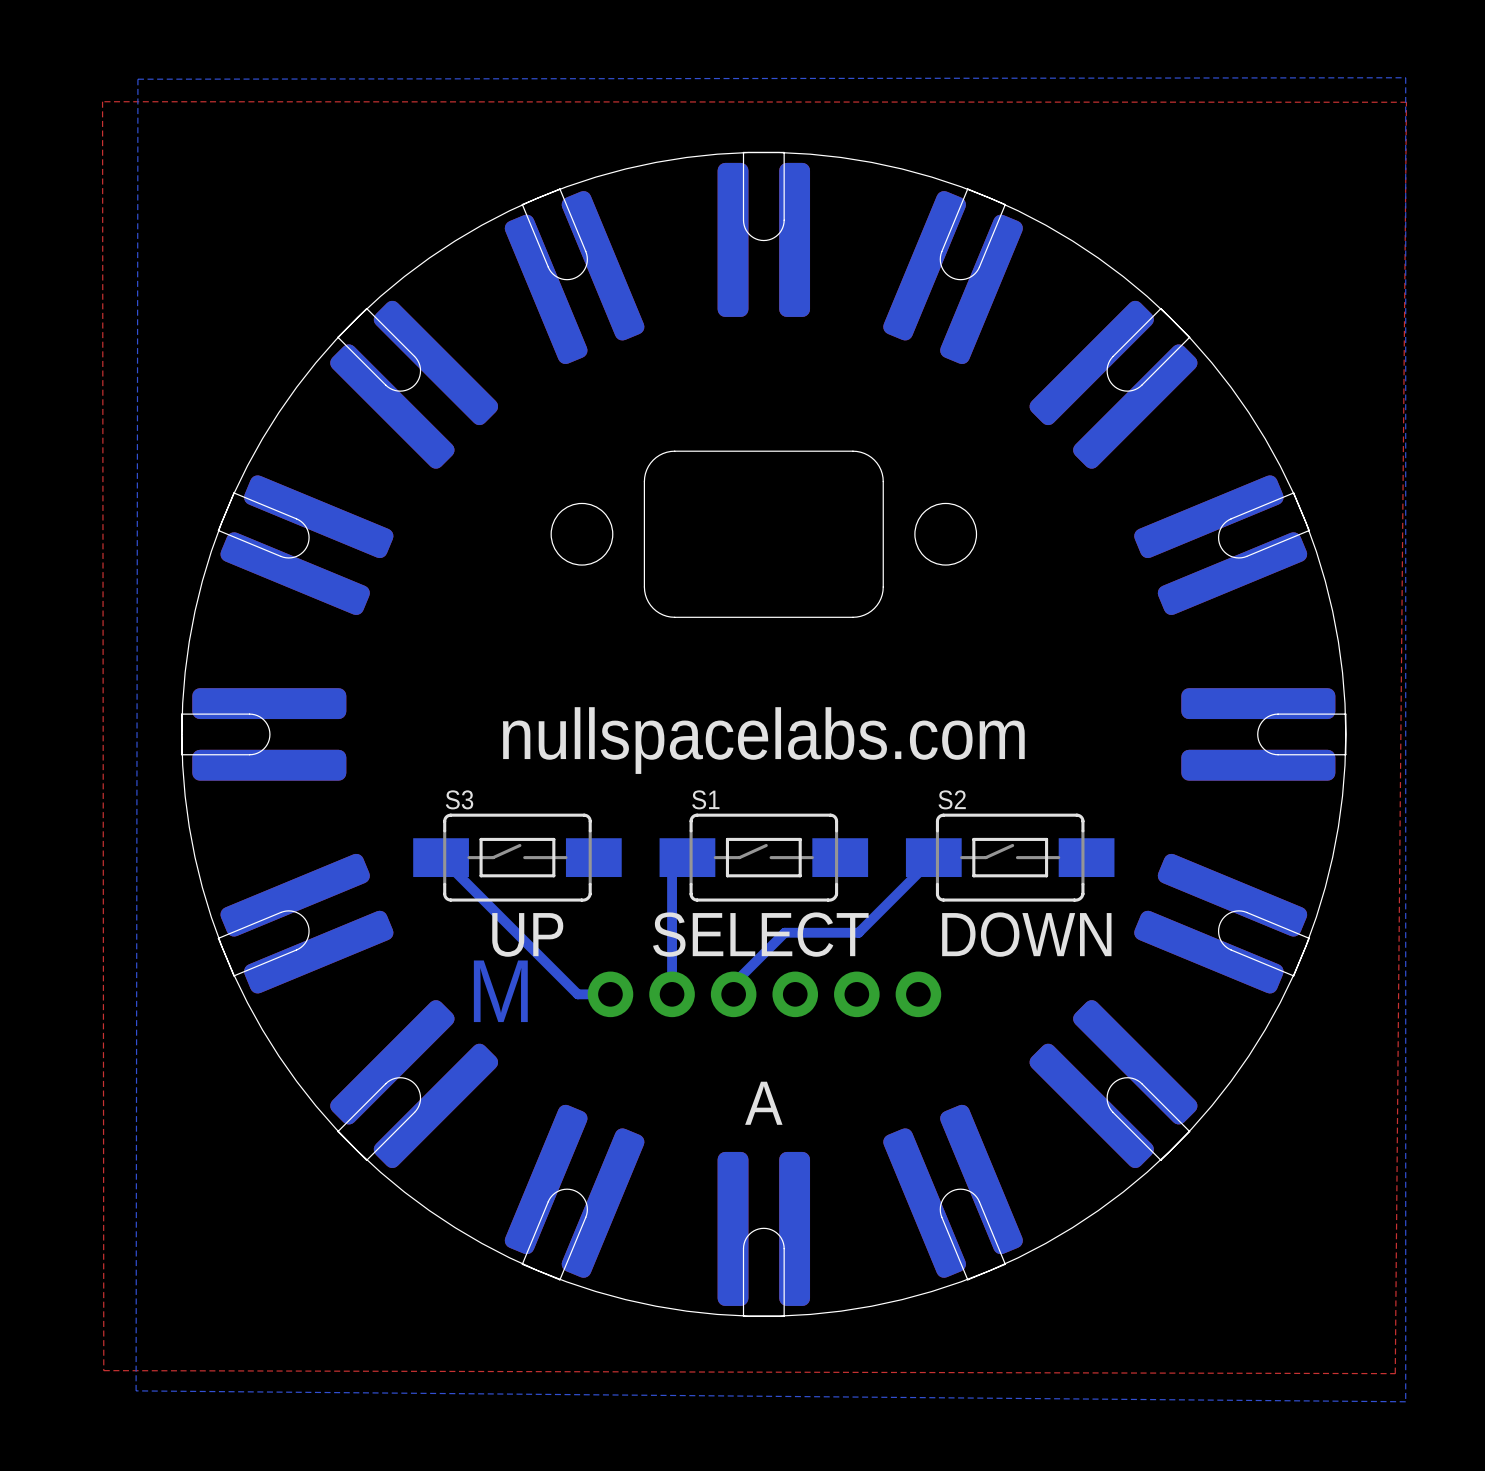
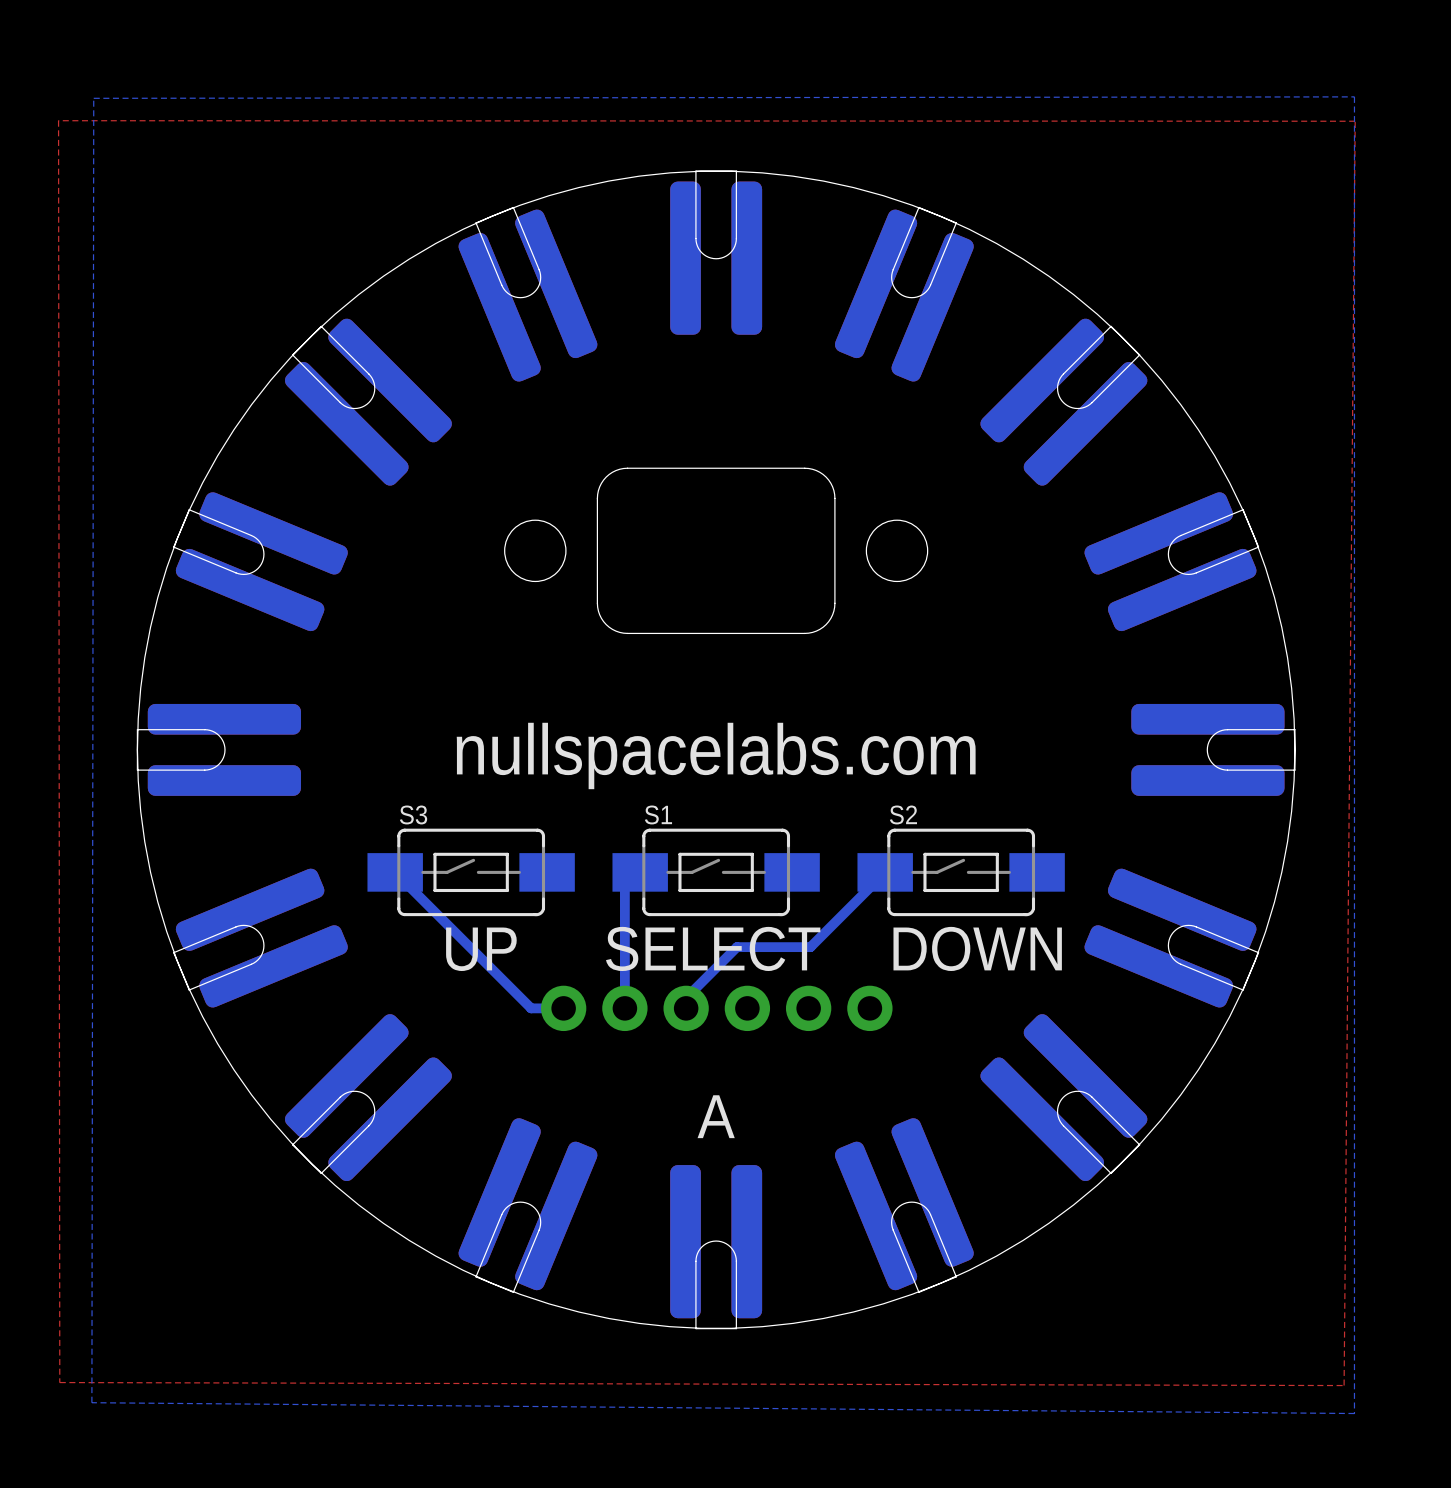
text: M (500, 991) -> none

